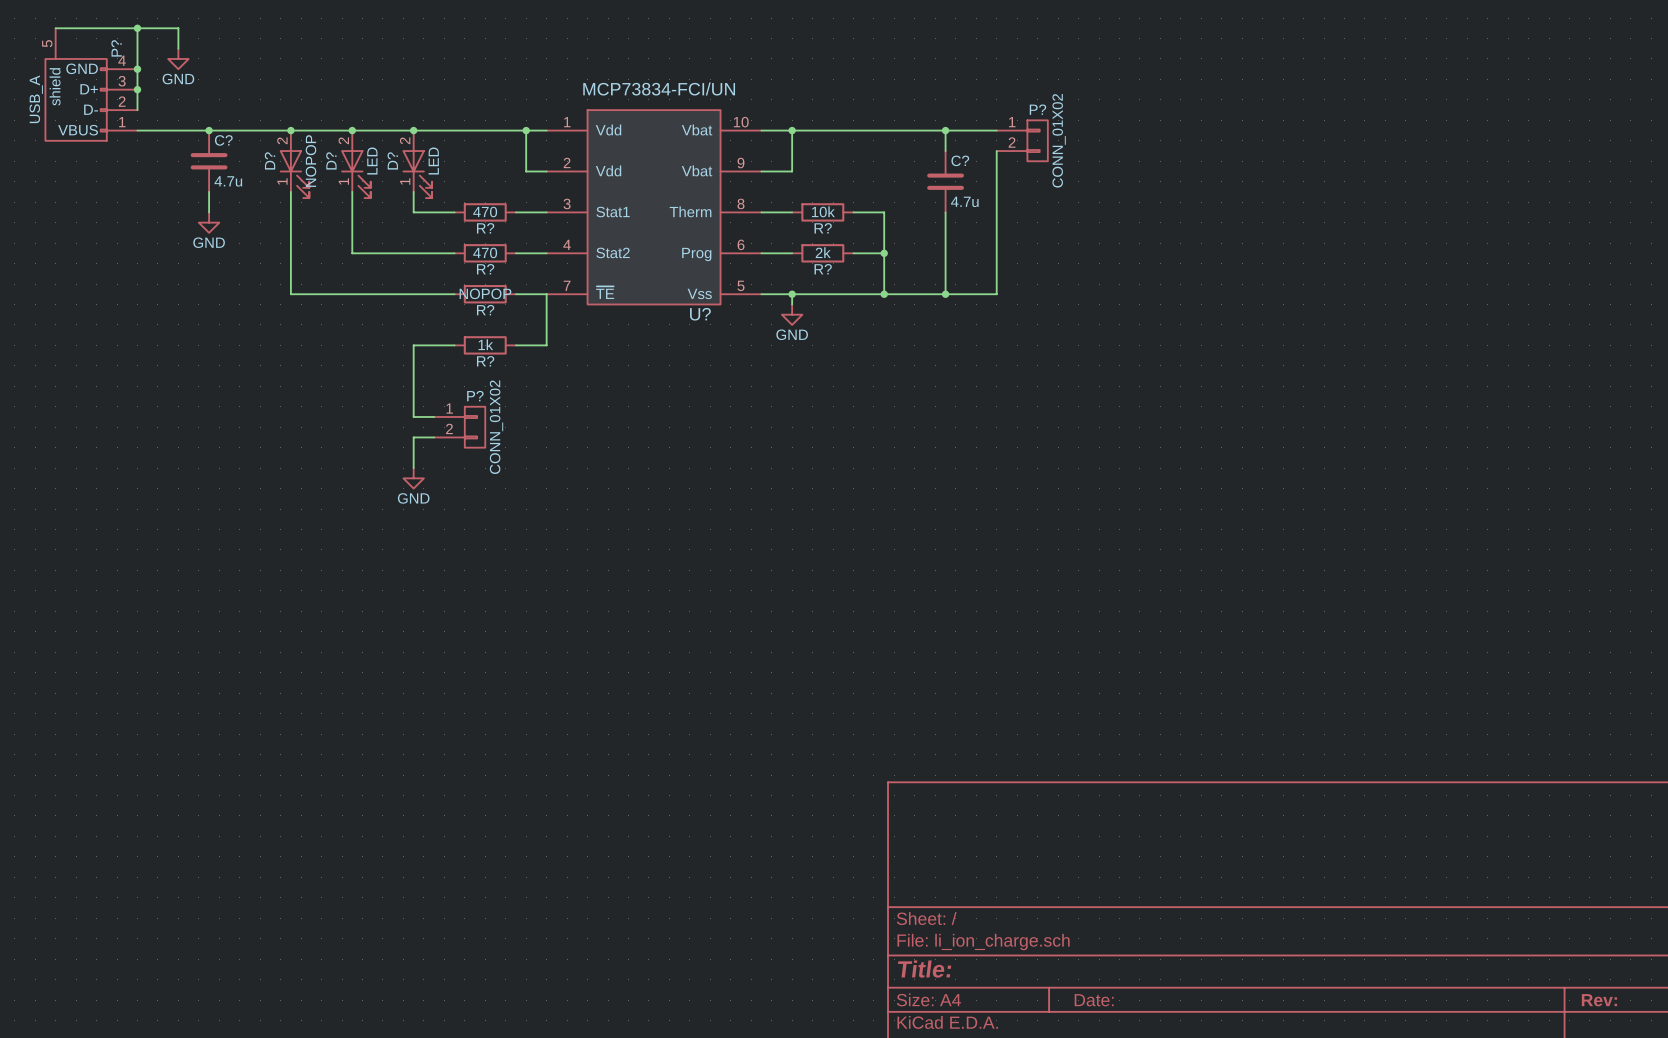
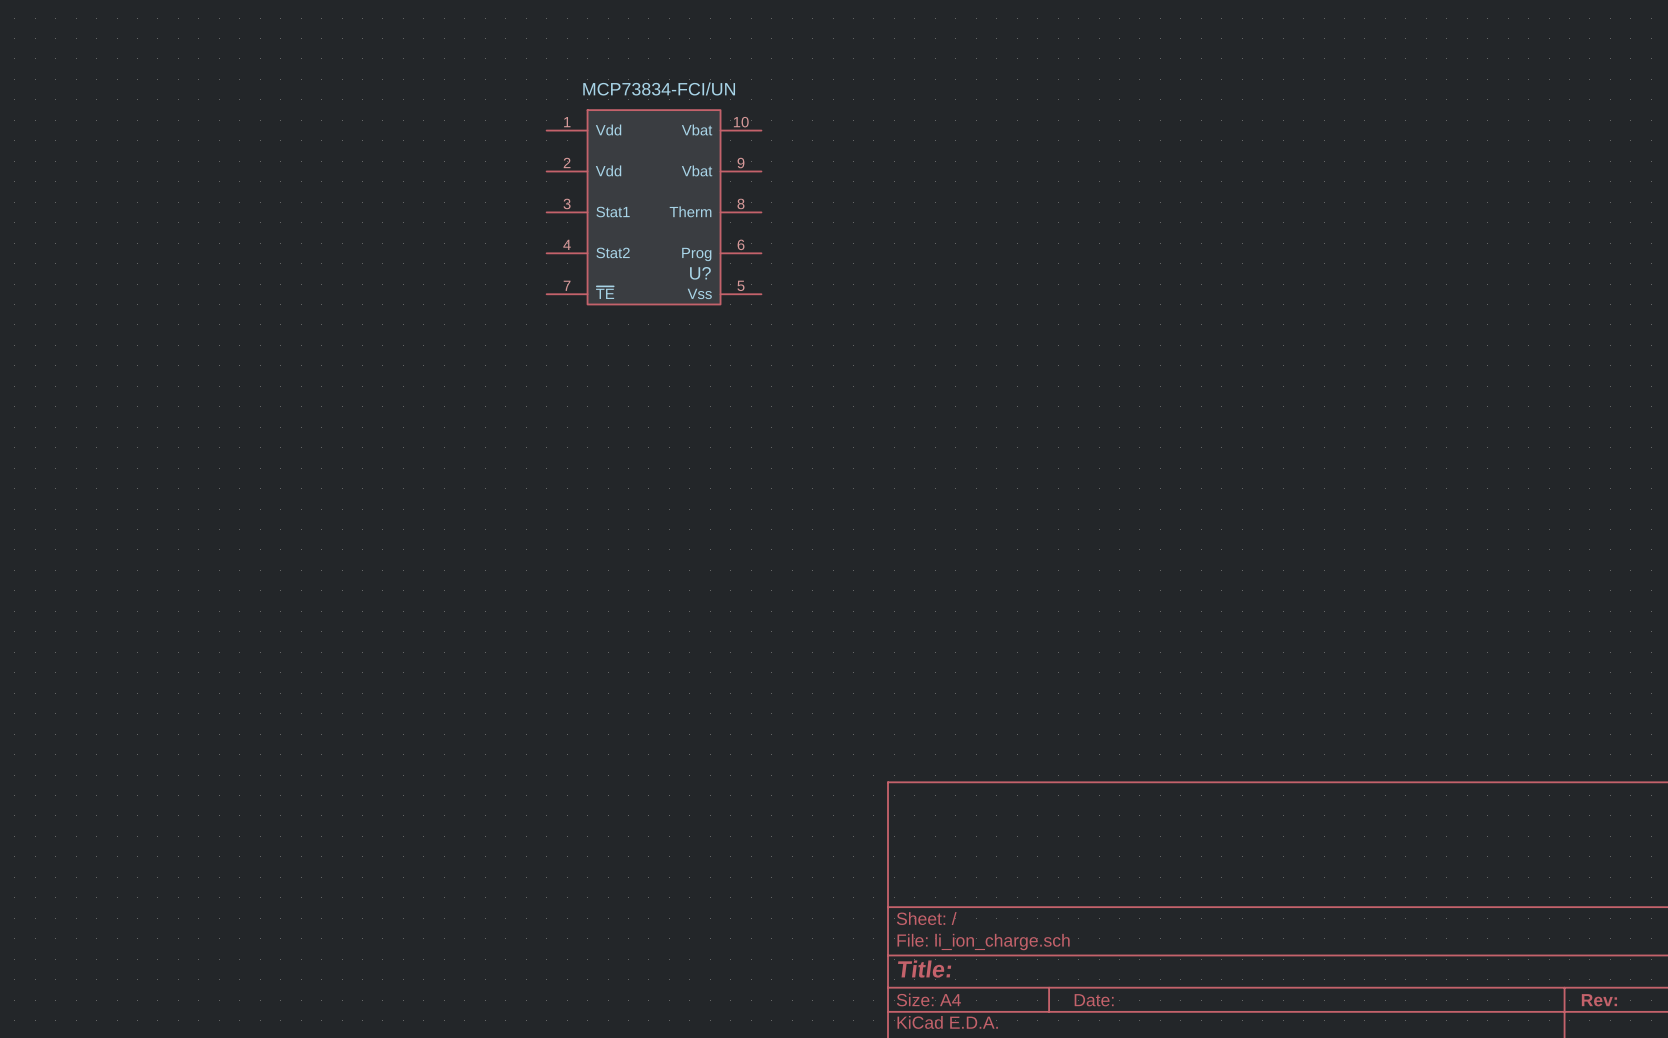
wire: (55, 28) (178, 28) (178, 48) -> none
wire: (137, 28) (137, 110) -> none
junction: (137, 28) -> none
power symbol: GND (178, 58) -> none
junction: (137, 69) -> none
P?: USB_A (91, 84) -> none
junction: (137, 89) -> none
wire: (137, 130) (546, 130) -> none
junction: (209, 130) -> none
junction: (290, 130) -> none
junction: (352, 130) -> none
junction: (413, 130) -> none
wire: (526, 130) (526, 171) (546, 171) -> none
junction: (526, 130) -> none
wire: (761, 130) (996, 130) -> none
wire: (792, 130) (792, 171) (761, 171) -> none
junction: (792, 130) -> none
wire: (945, 130) (945, 151) -> none
junction: (945, 130) -> none
P?: CONN_01X02 (1022, 140) -> none
wire: (996, 151) (996, 294) (761, 294) -> none
C?: 4.7u (209, 161) -> none
D?: NOPOP (294, 164) -> none
D?: LED (355, 164) -> none
D?: LED (417, 164) -> none
C?: 4.7u (945, 181) -> none
wire: (209, 191) (209, 212) -> none
wire: (290, 191) (290, 294) (454, 294) -> none
wire: (352, 191) (352, 253) (454, 253) -> none
wire: (413, 191) (413, 212) (454, 212) -> none
R?: 470 (485, 212) -> none
wire: (515, 212) (546, 212) -> none
wire: (761, 212) (792, 212) -> none
R?: 10k (822, 212) -> none
wire: (853, 212) (884, 212) (884, 294) -> none
wire: (945, 212) (945, 294) -> none
power symbol: GND (209, 222) -> none
R?: 470 (485, 253) -> none
wire: (515, 253) (546, 253) -> none
wire: (761, 253) (792, 253) -> none
R?: 2k (822, 253) -> none
wire: (853, 253) (884, 253) -> none
junction: (884, 253) -> none
R?: NOPOP (485, 294) -> none
wire: (515, 294) (546, 294) (546, 345) (515, 345) -> none
wire: (792, 294) (792, 304) -> none
junction: (792, 294) -> none
junction: (884, 294) -> none
junction: (945, 294) -> none
U? name position: U? (700, 314) -> U? (700, 273)
power symbol: GND (792, 314) -> none
wire: (454, 345) (413, 345) (413, 416) (434, 416) -> none
R?: 1k (485, 345) -> none
P?: CONN_01X02 (459, 427) -> none
wire: (434, 437) (413, 437) (413, 468) -> none
power symbol: GND (413, 478) -> none

